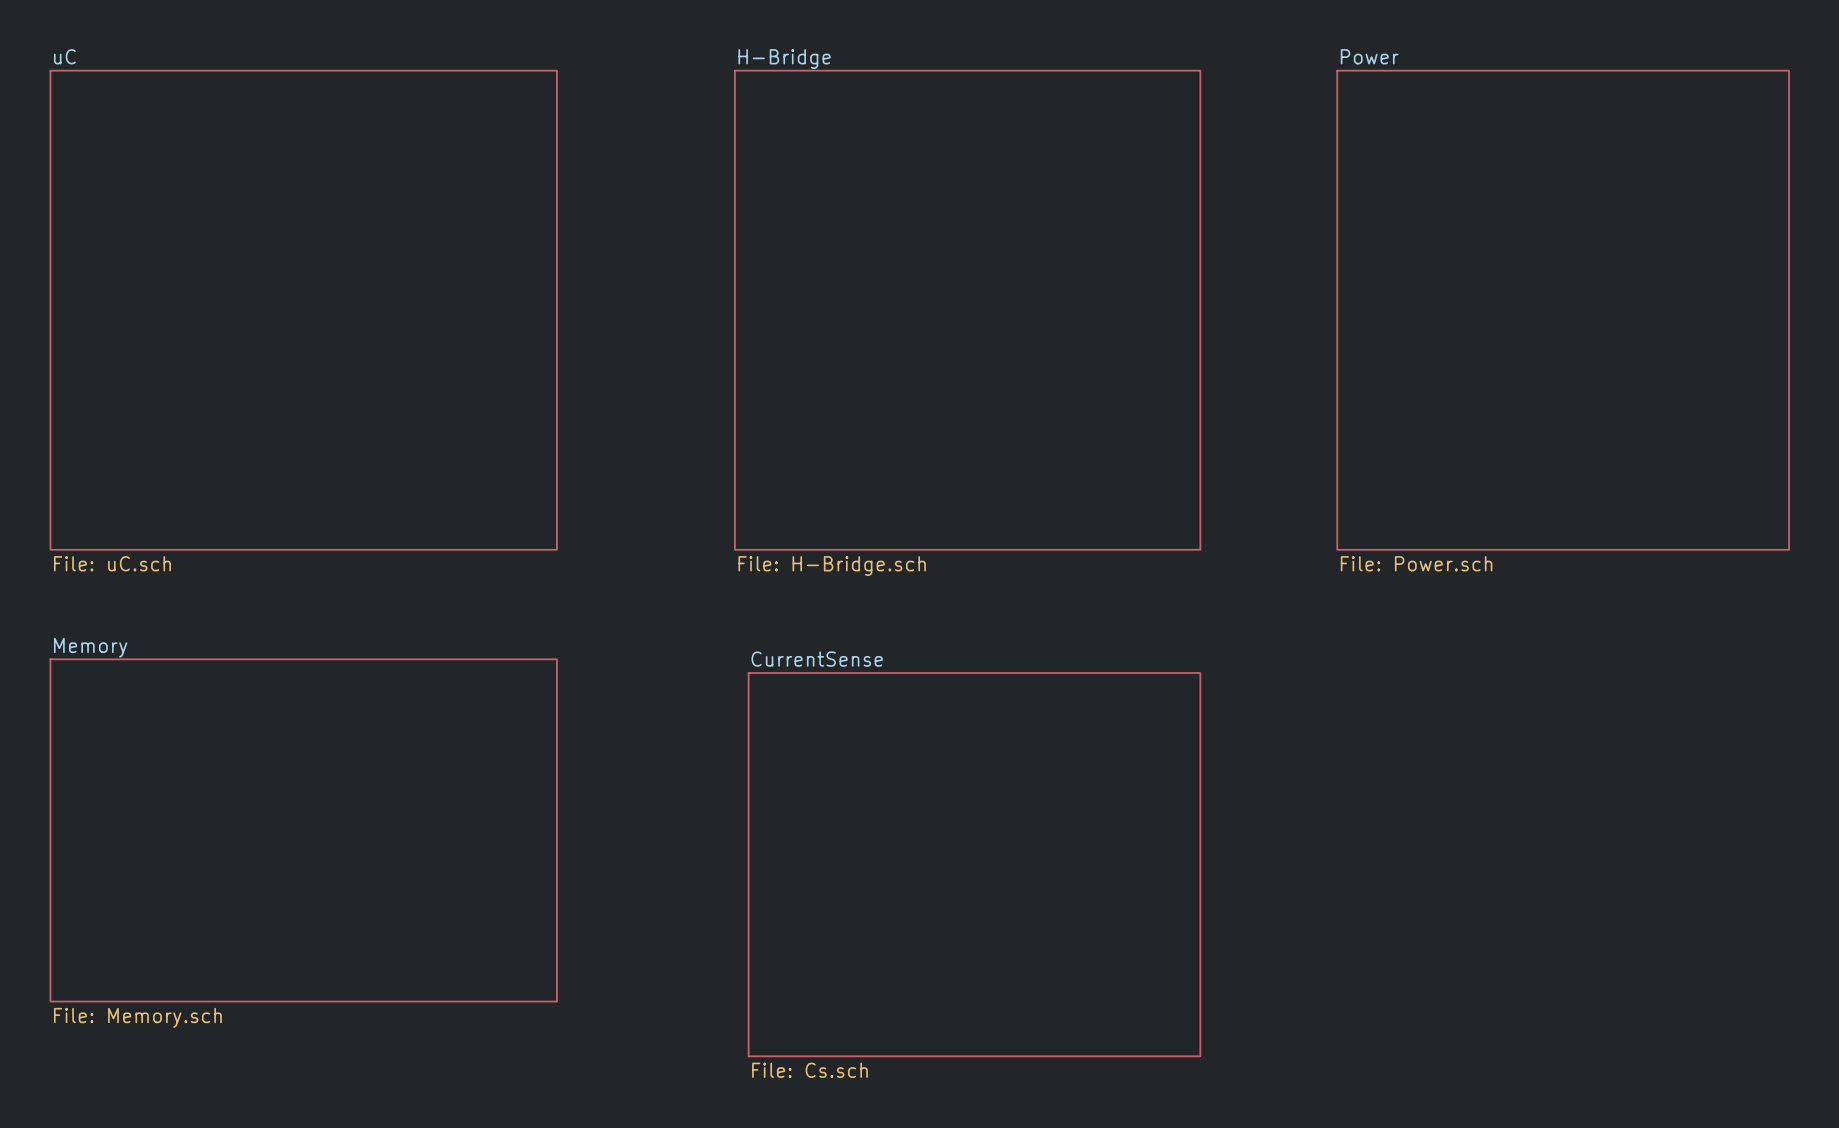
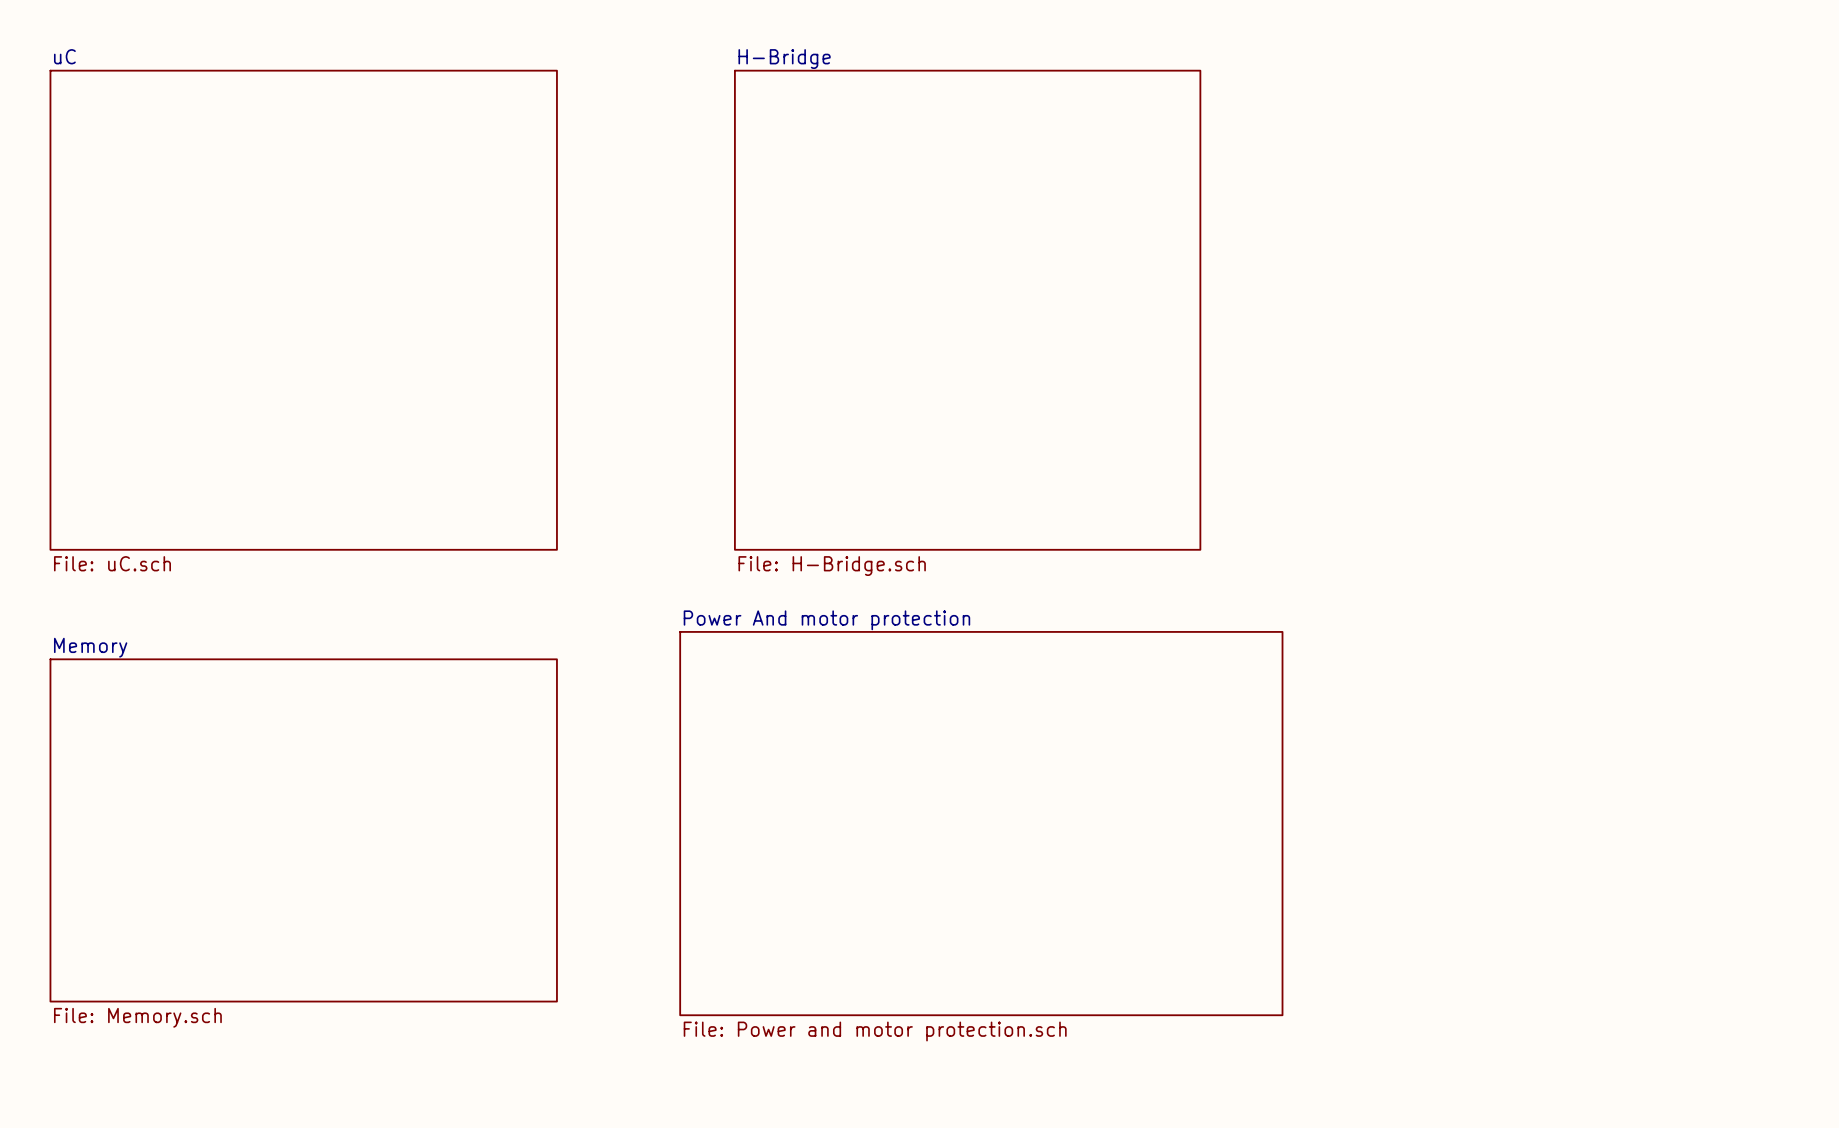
sheet Power: File: Power.sch (1563, 310) -> none
sheet Power And motor protection: none -> File: Power and motor protection.sch (981, 823)
sheet CurrentSense: File: Cs.sch (974, 864) -> none

